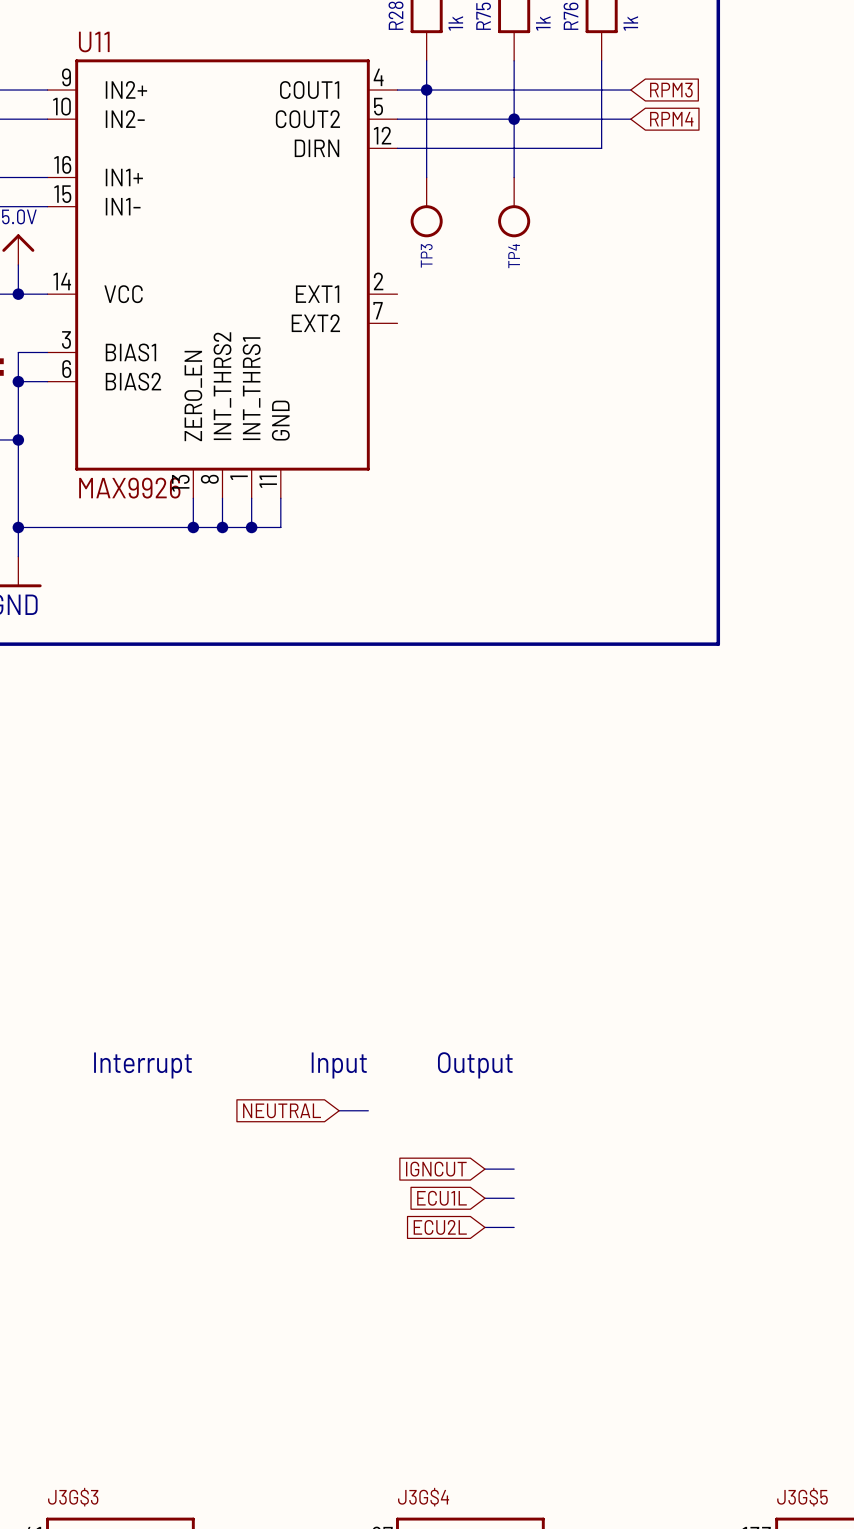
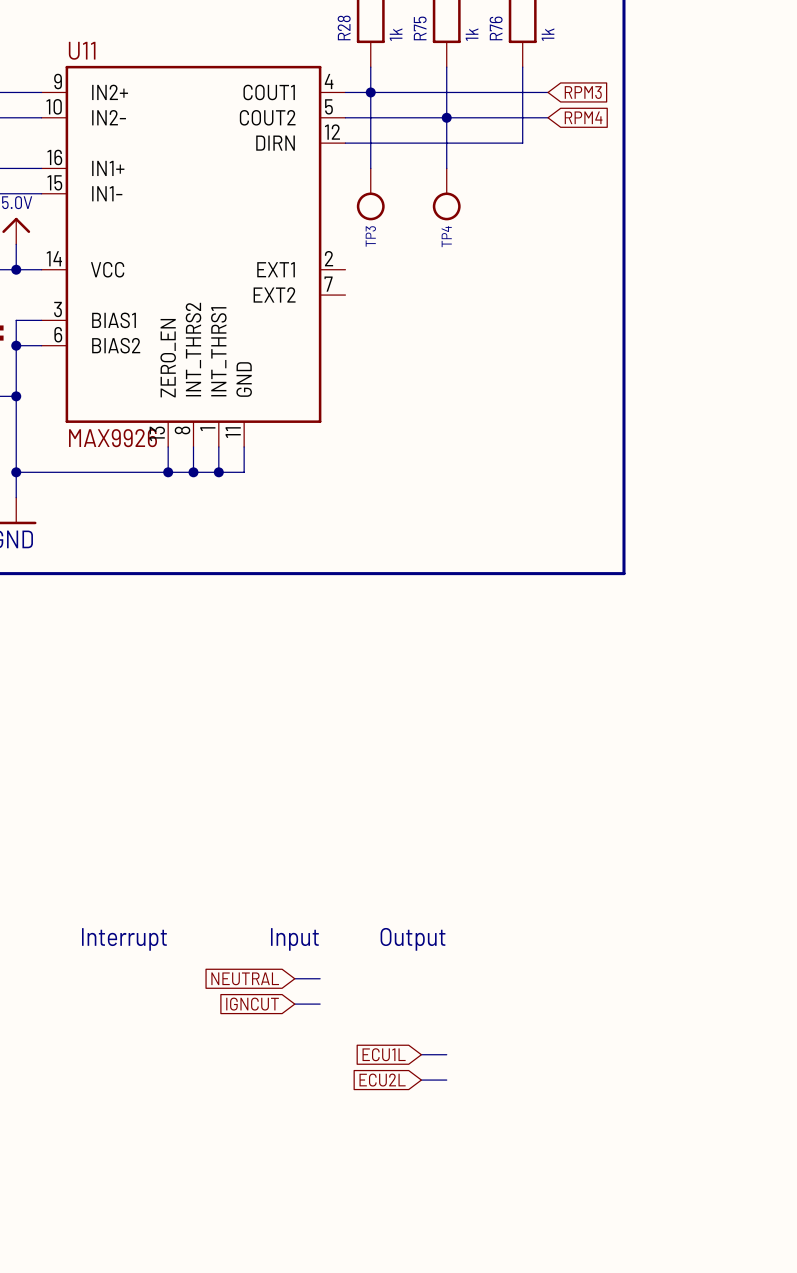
global label position: IGNCUT (436, 1169) -> IGNCUT (252, 1004)
wire: (484, 1169) (514, 1169) -> (294, 1004) (320, 1004)

